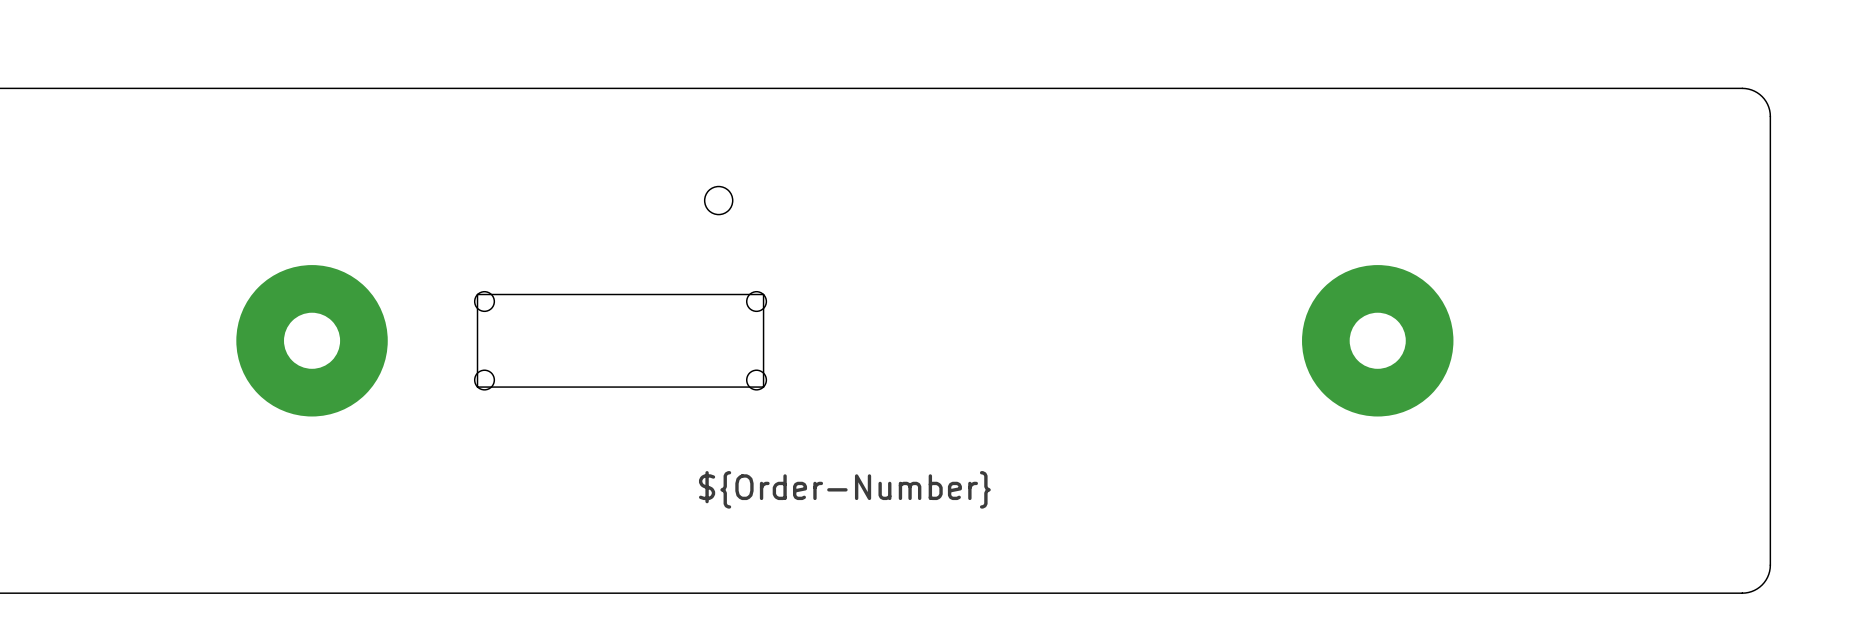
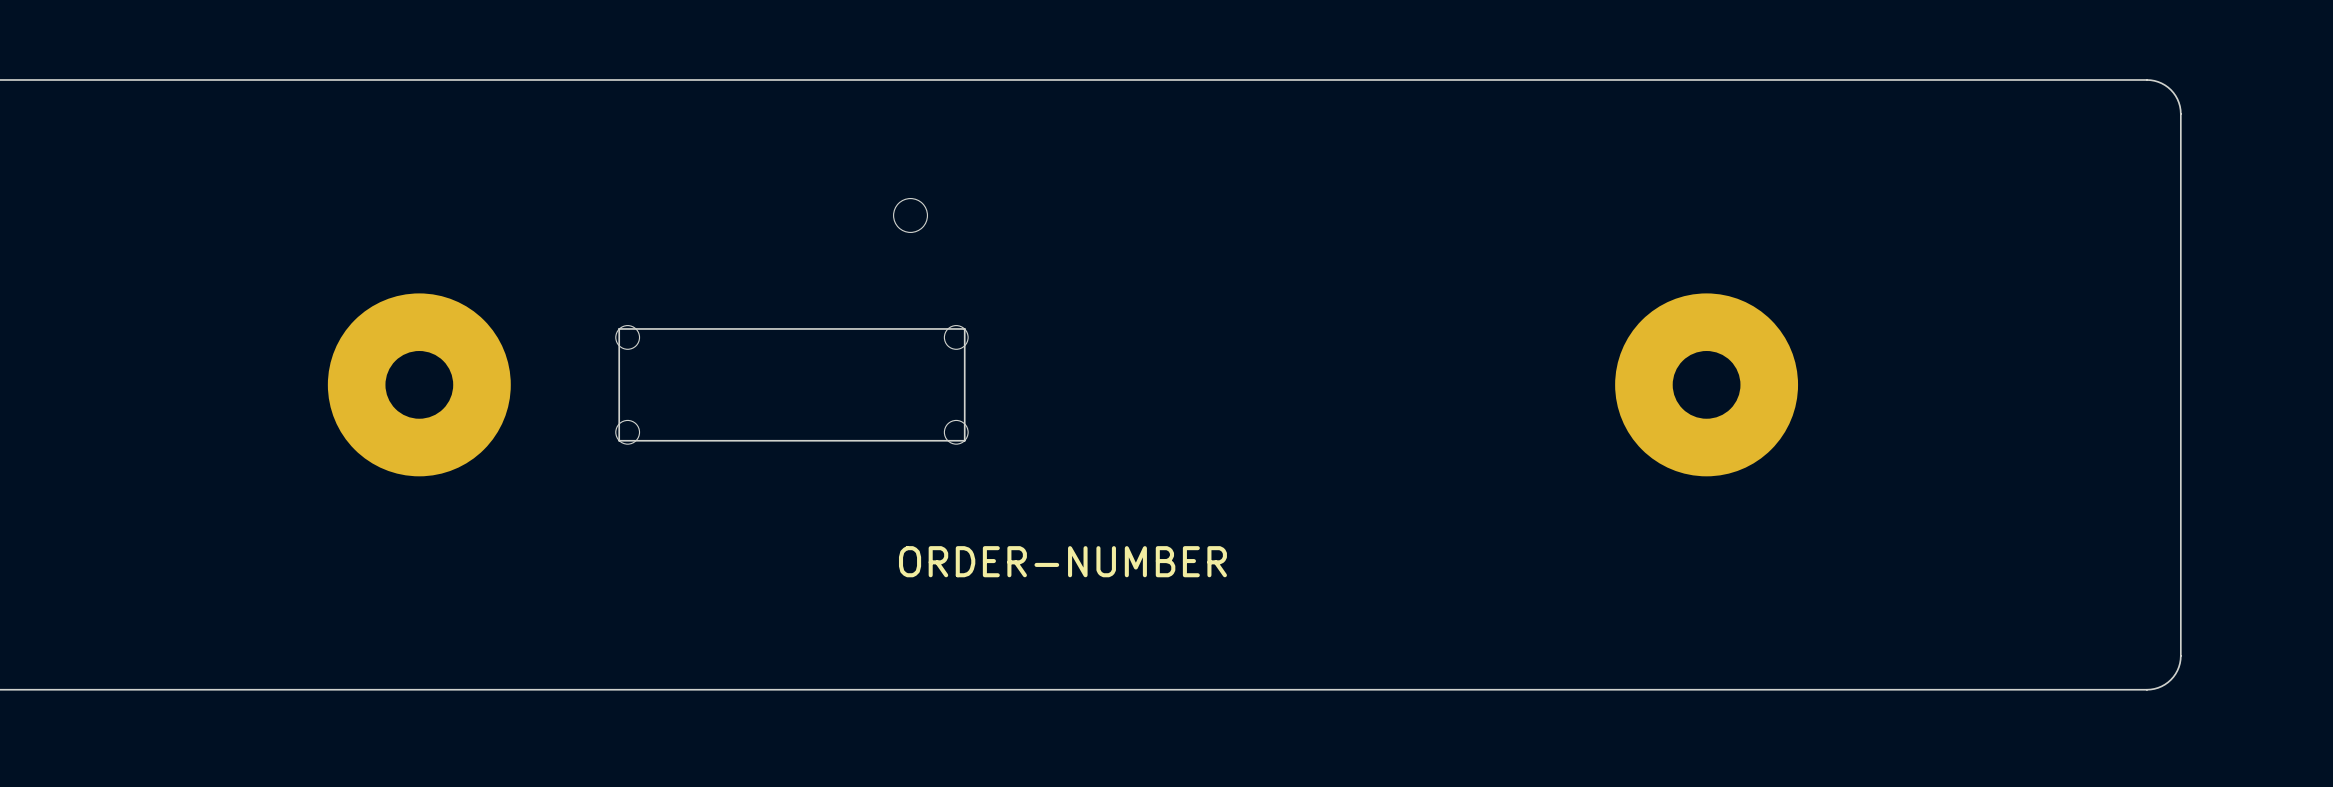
drawing shape: [698, 471, 991, 509] -> [898, 546, 1227, 578]

